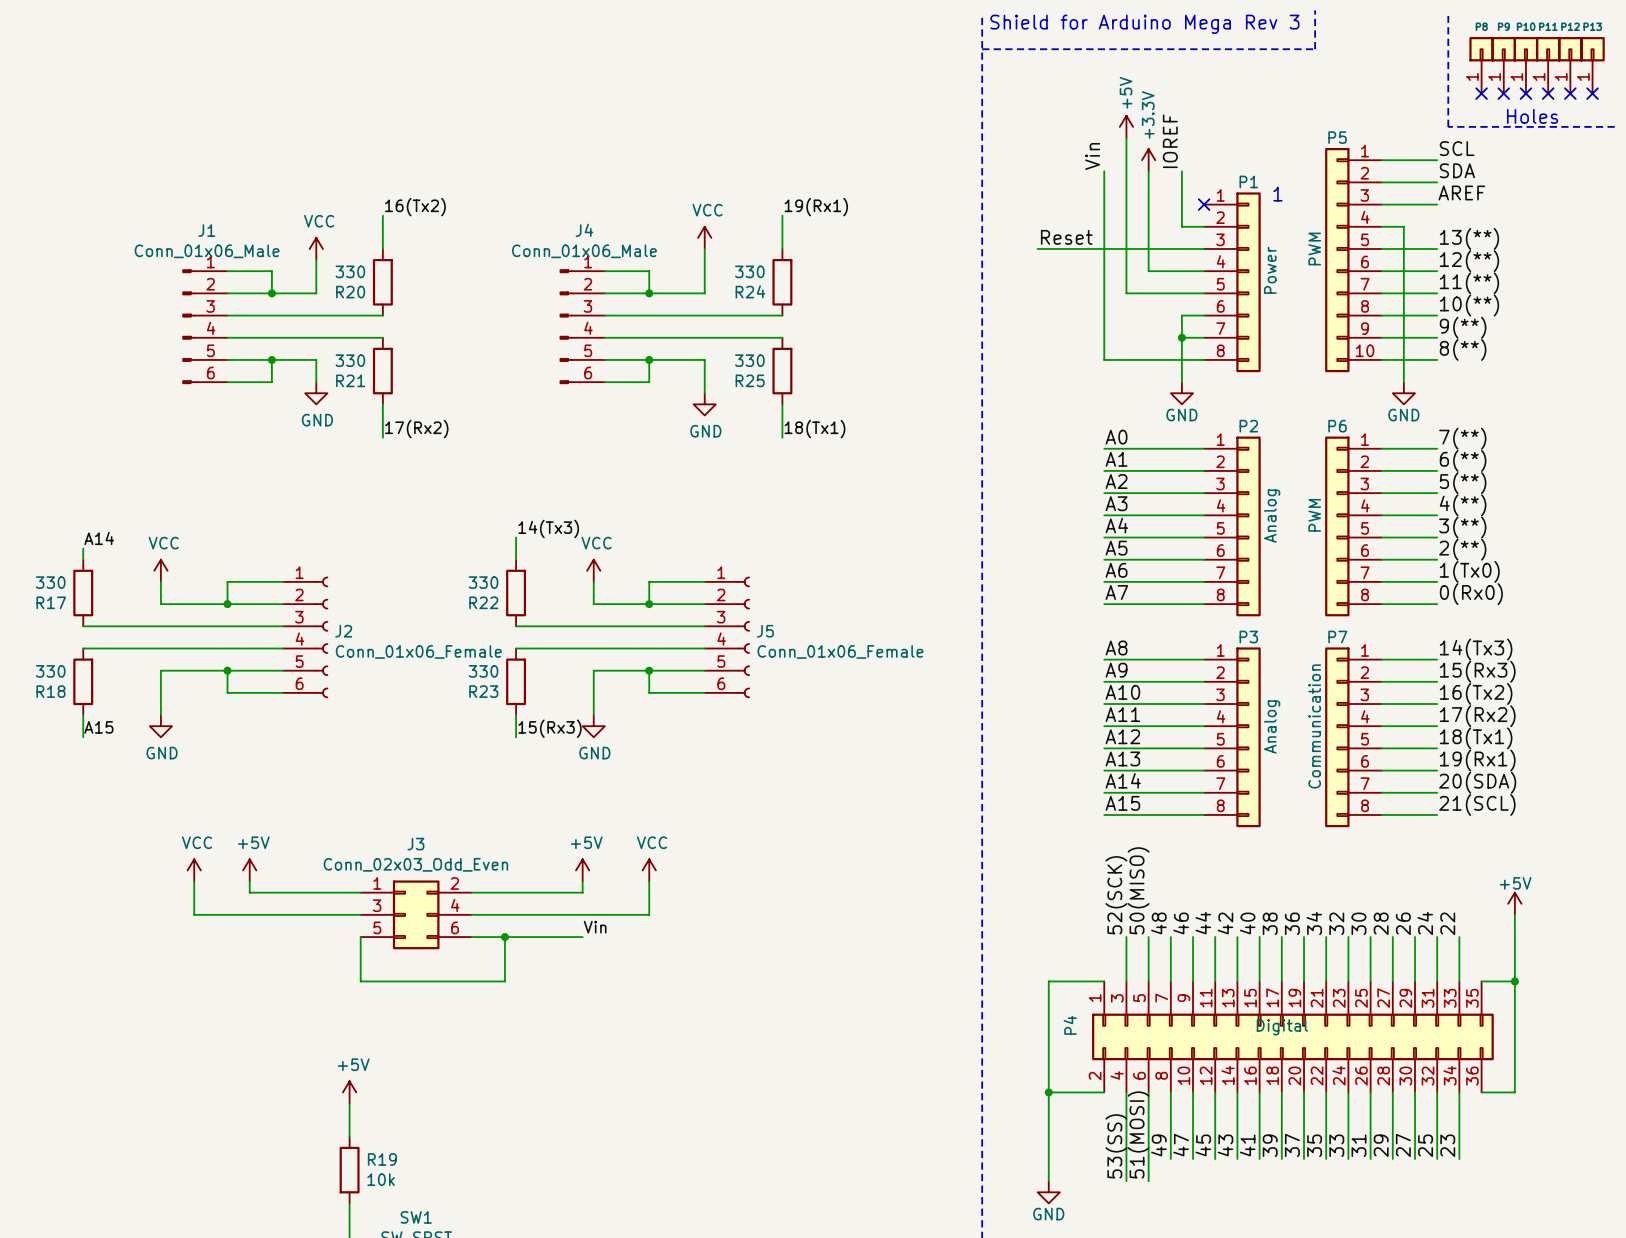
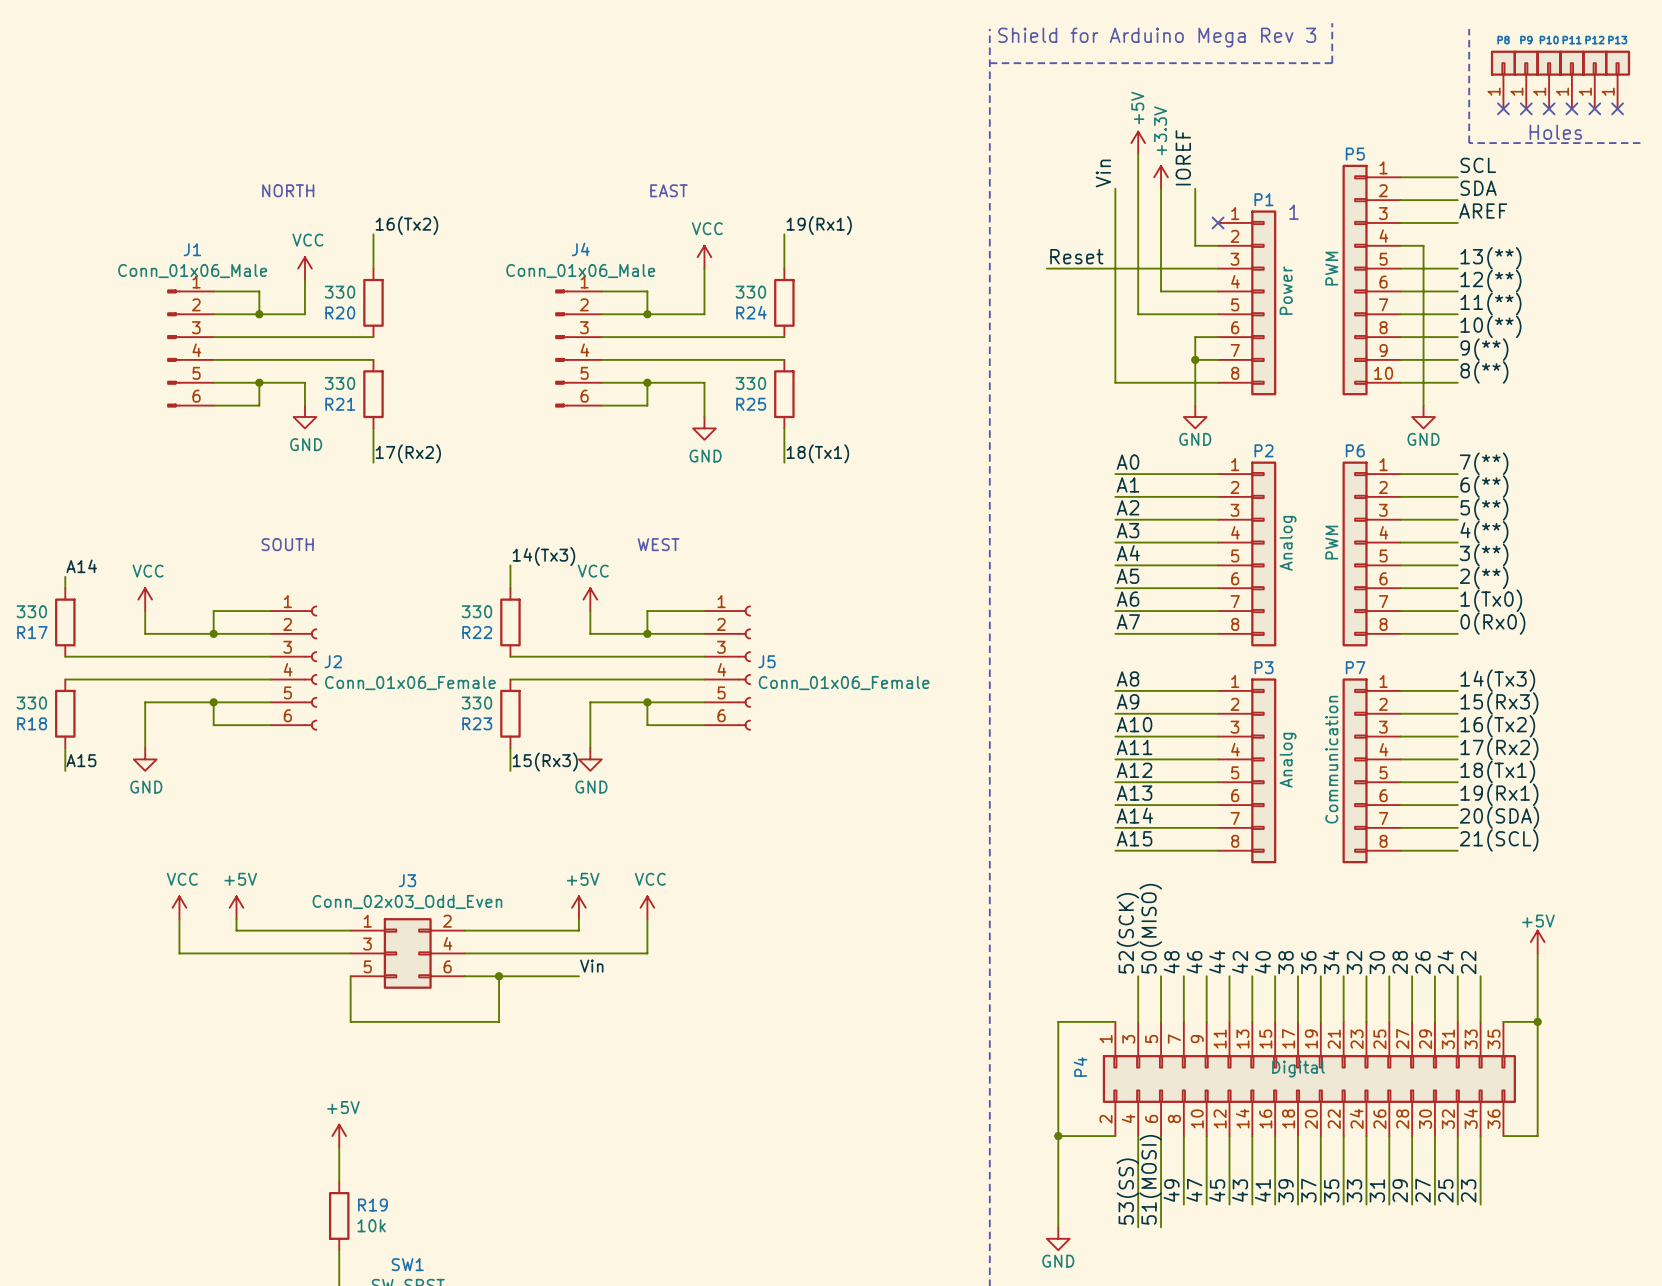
text: none -> NORTH (288, 190)
text: none -> EAST (668, 190)
text: none -> SOUTH (287, 544)
text: none -> WEST (658, 544)

